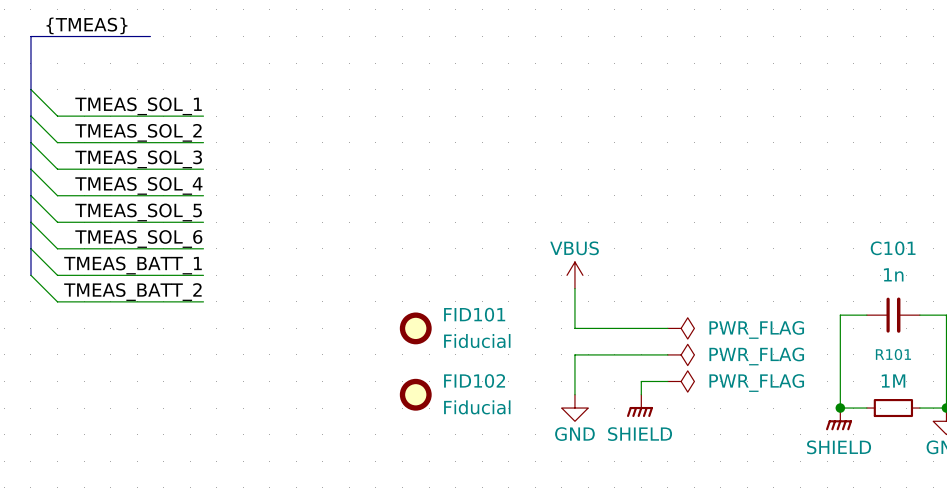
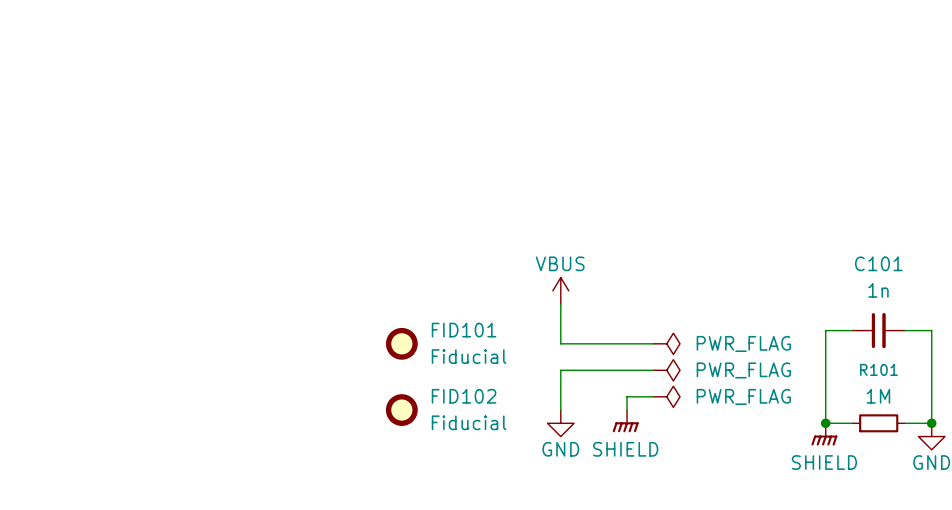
label: {TMEAS} (87, 25) -> none
bus: (150, 36) (30, 36) (30, 275) -> none
wire: (30, 89) (57, 116) (203, 116) -> none
label: TMEAS_SOL_1 (138, 106) -> none
wire: (30, 116) (57, 142) (203, 142) -> none
label: TMEAS_SOL_2 (138, 132) -> none
wire: (30, 142) (57, 169) (203, 169) -> none
label: TMEAS_SOL_3 (138, 159) -> none
wire: (30, 169) (57, 195) (203, 195) -> none
label: TMEAS_SOL_4 (138, 185) -> none
wire: (30, 195) (57, 222) (203, 222) -> none
label: TMEAS_SOL_5 (138, 212) -> none
wire: (30, 222) (57, 248) (203, 248) -> none
label: TMEAS_SOL_6 (138, 238) -> none
wire: (30, 248) (57, 275) (203, 275) -> none
label: TMEAS_BATT_1 (132, 265) -> none
wire: (30, 275) (57, 301) (203, 301) -> none
label: TMEAS_BATT_2 (132, 292) -> none

